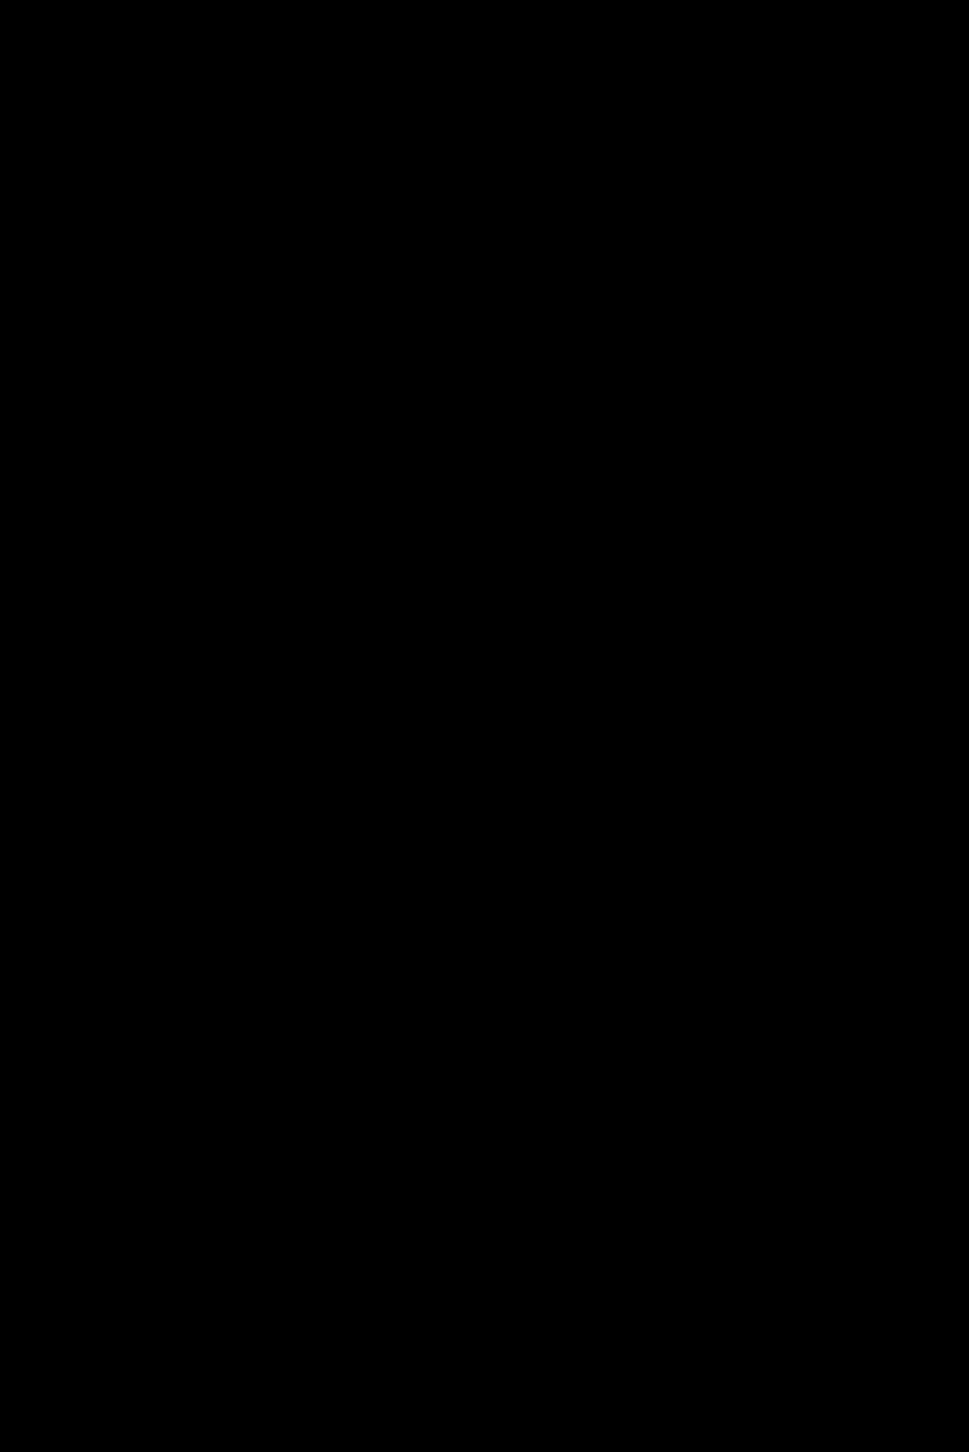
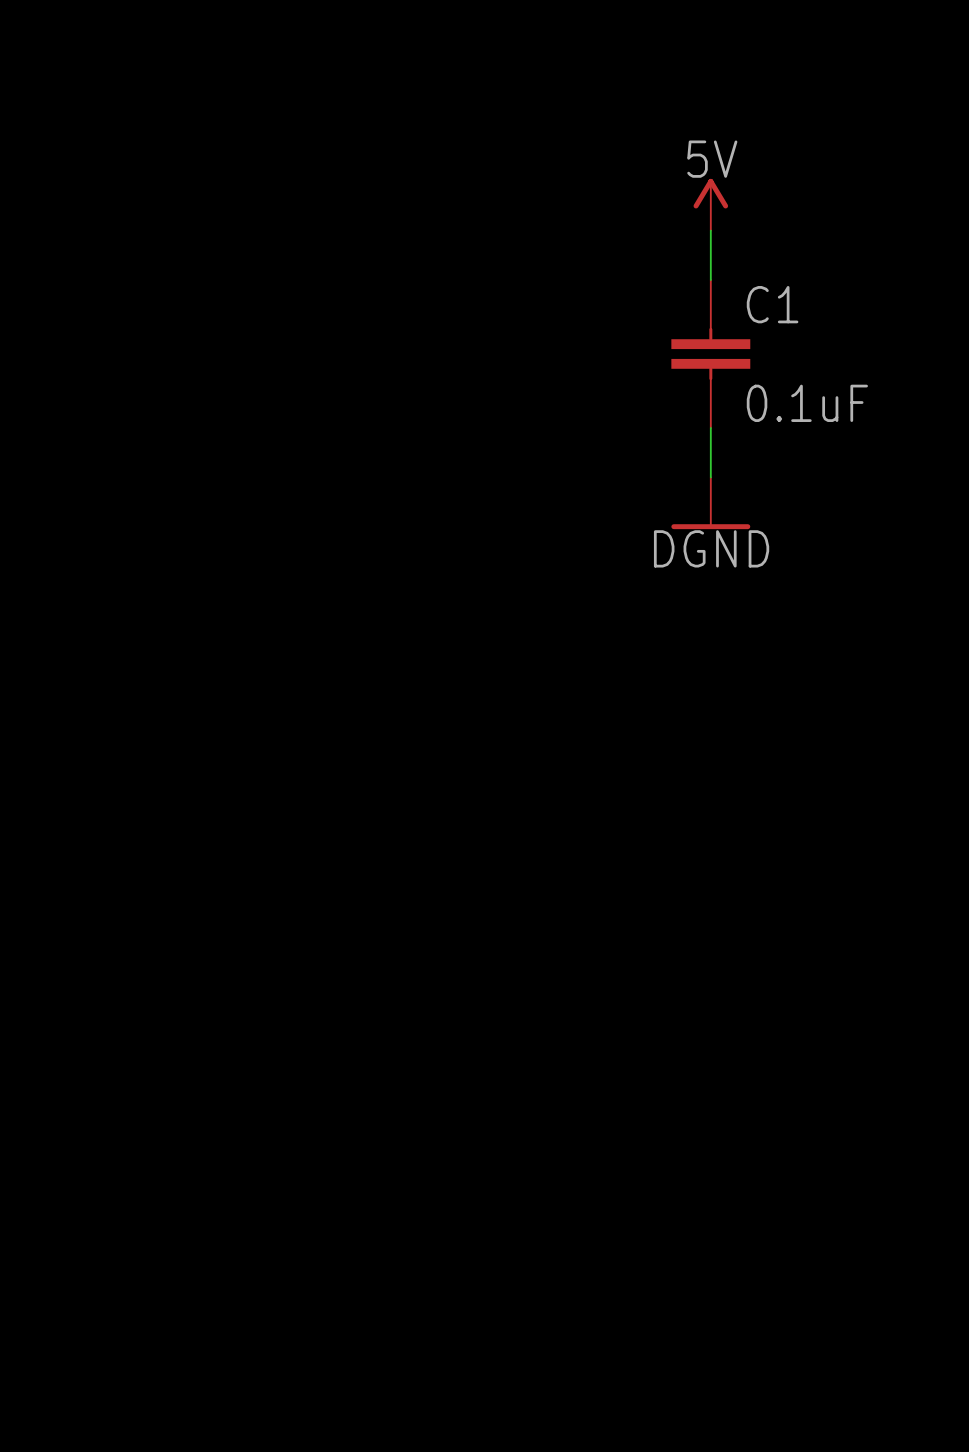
power symbol: none -> 5V (710, 204)
wire: none -> (710, 230) (710, 280)
C1: none -> 0.1uF (710, 354)
wire: none -> (710, 428) (710, 477)
power symbol: none -> DGND (710, 503)

